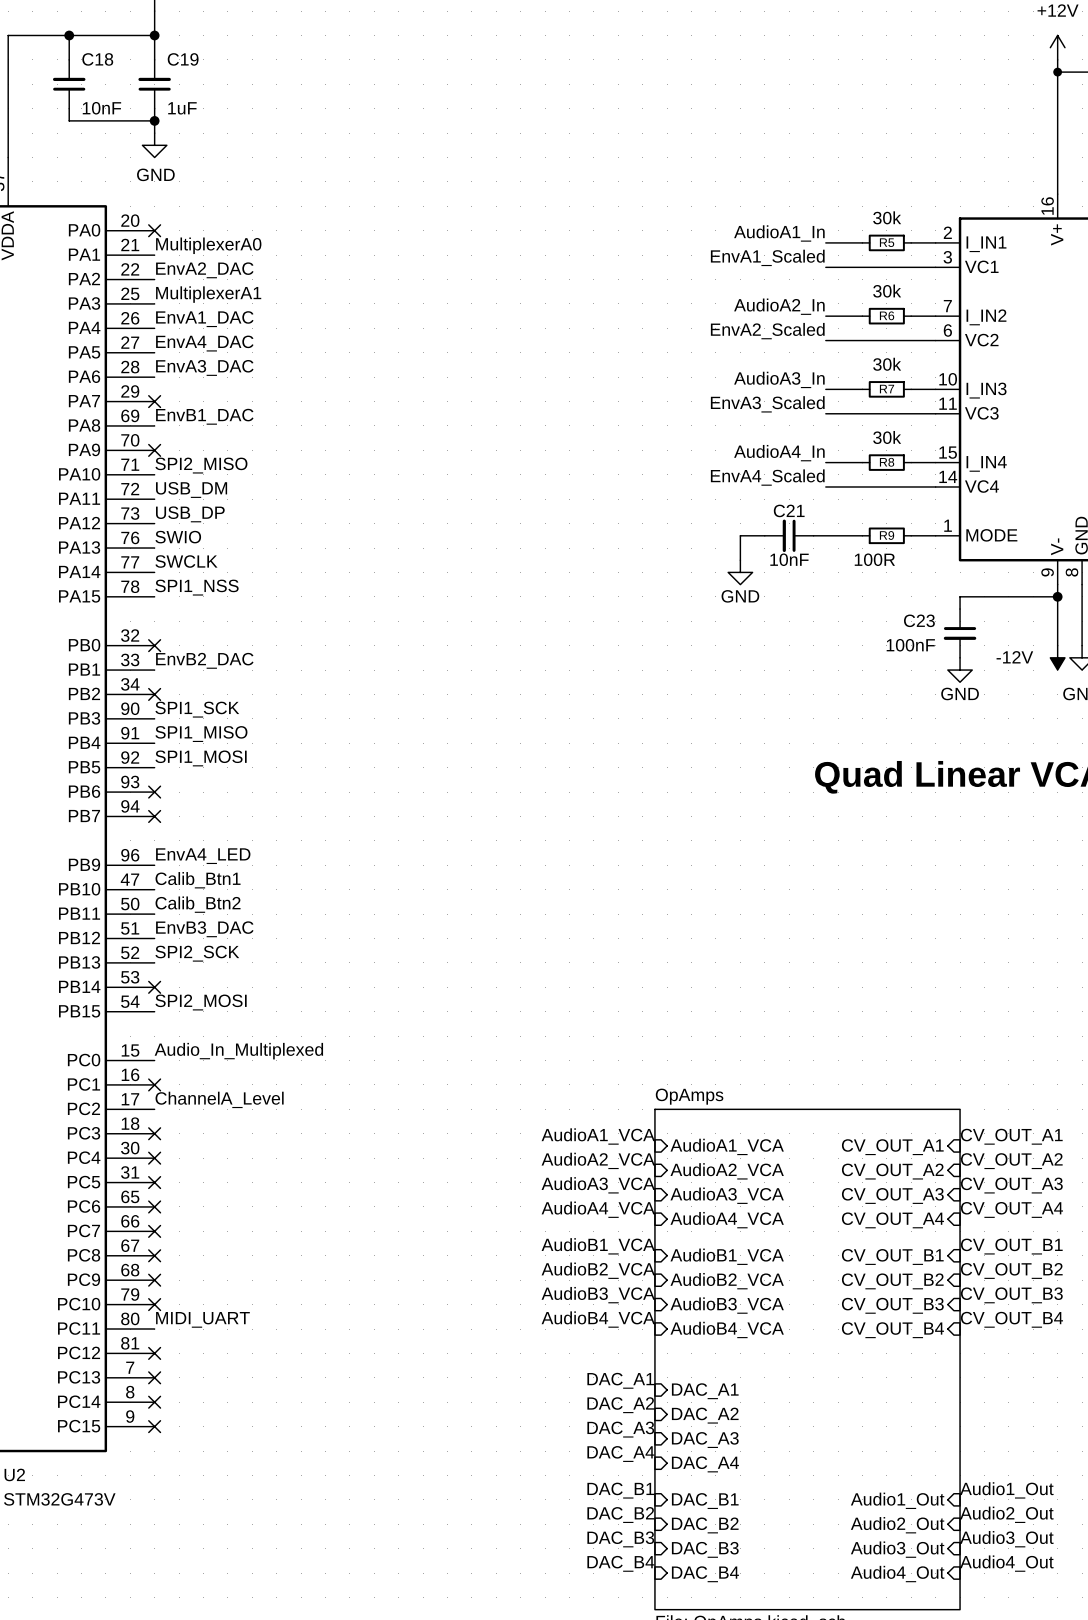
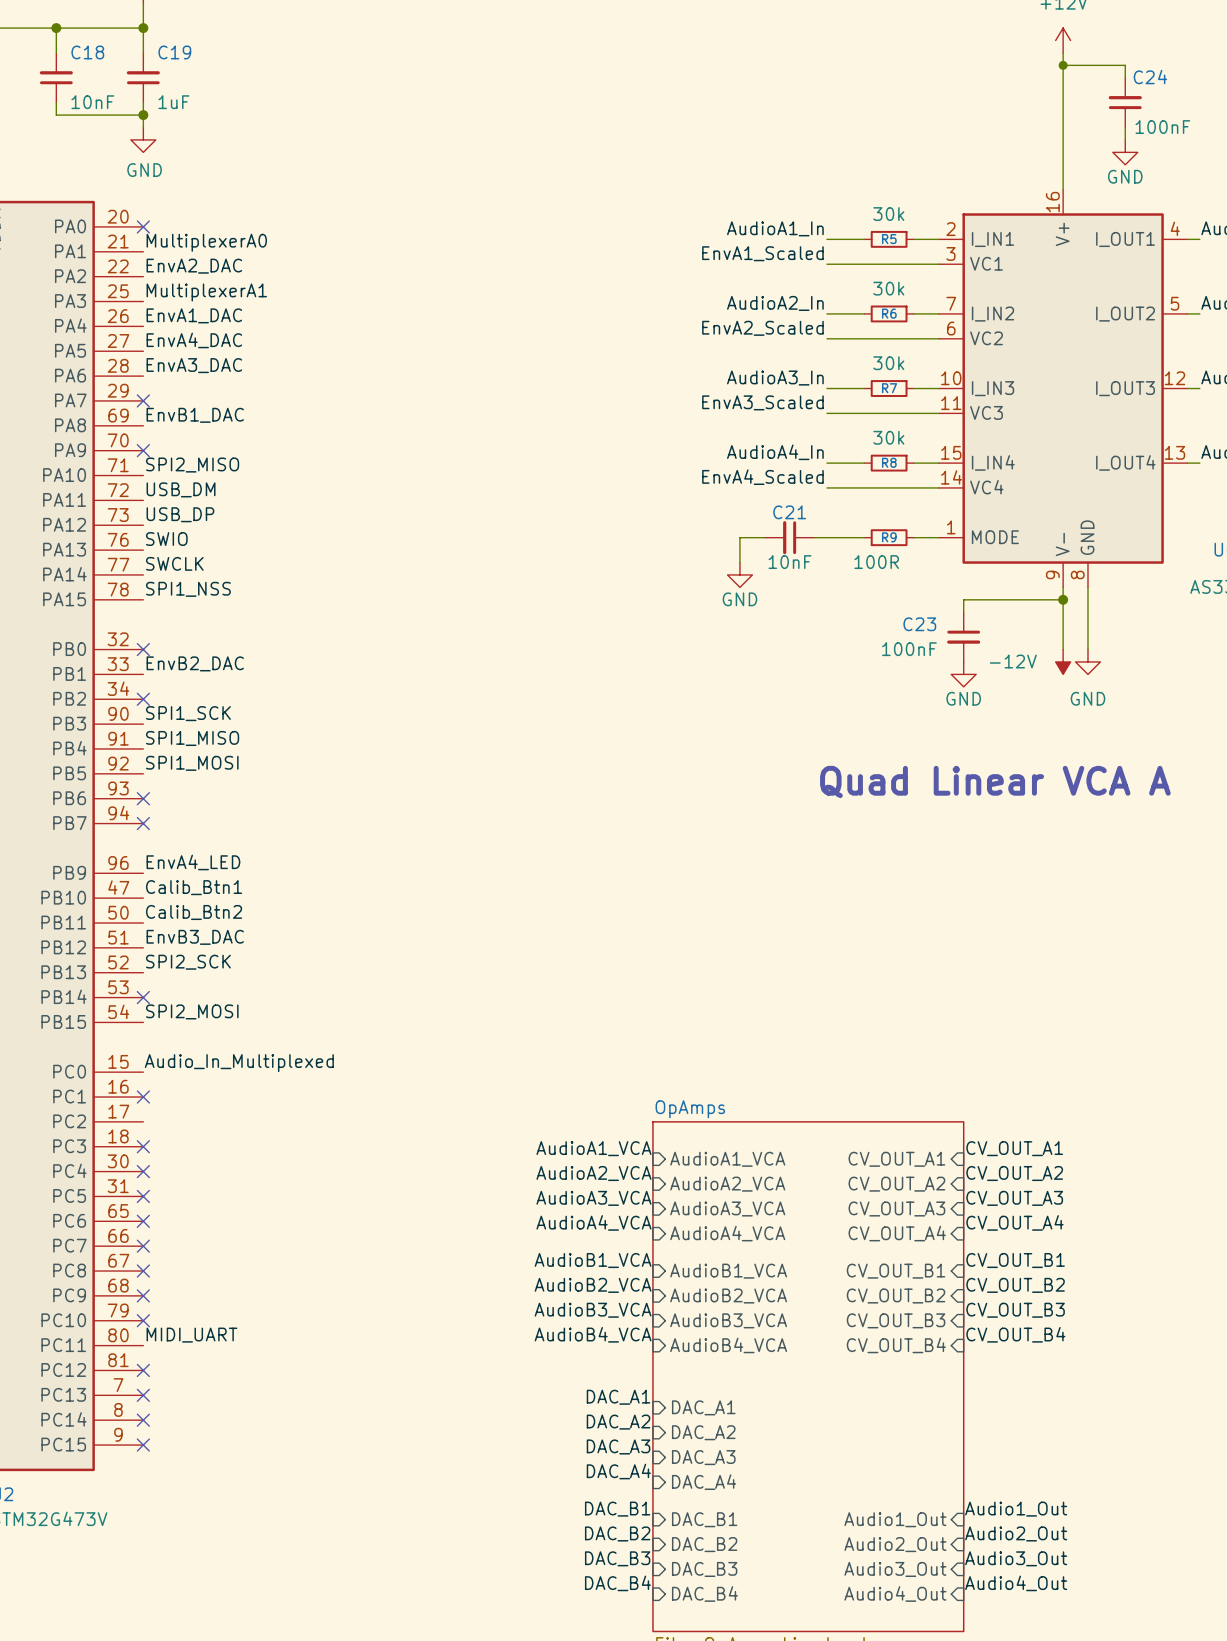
label: ChannelA_Level (219, 1099) -> none

